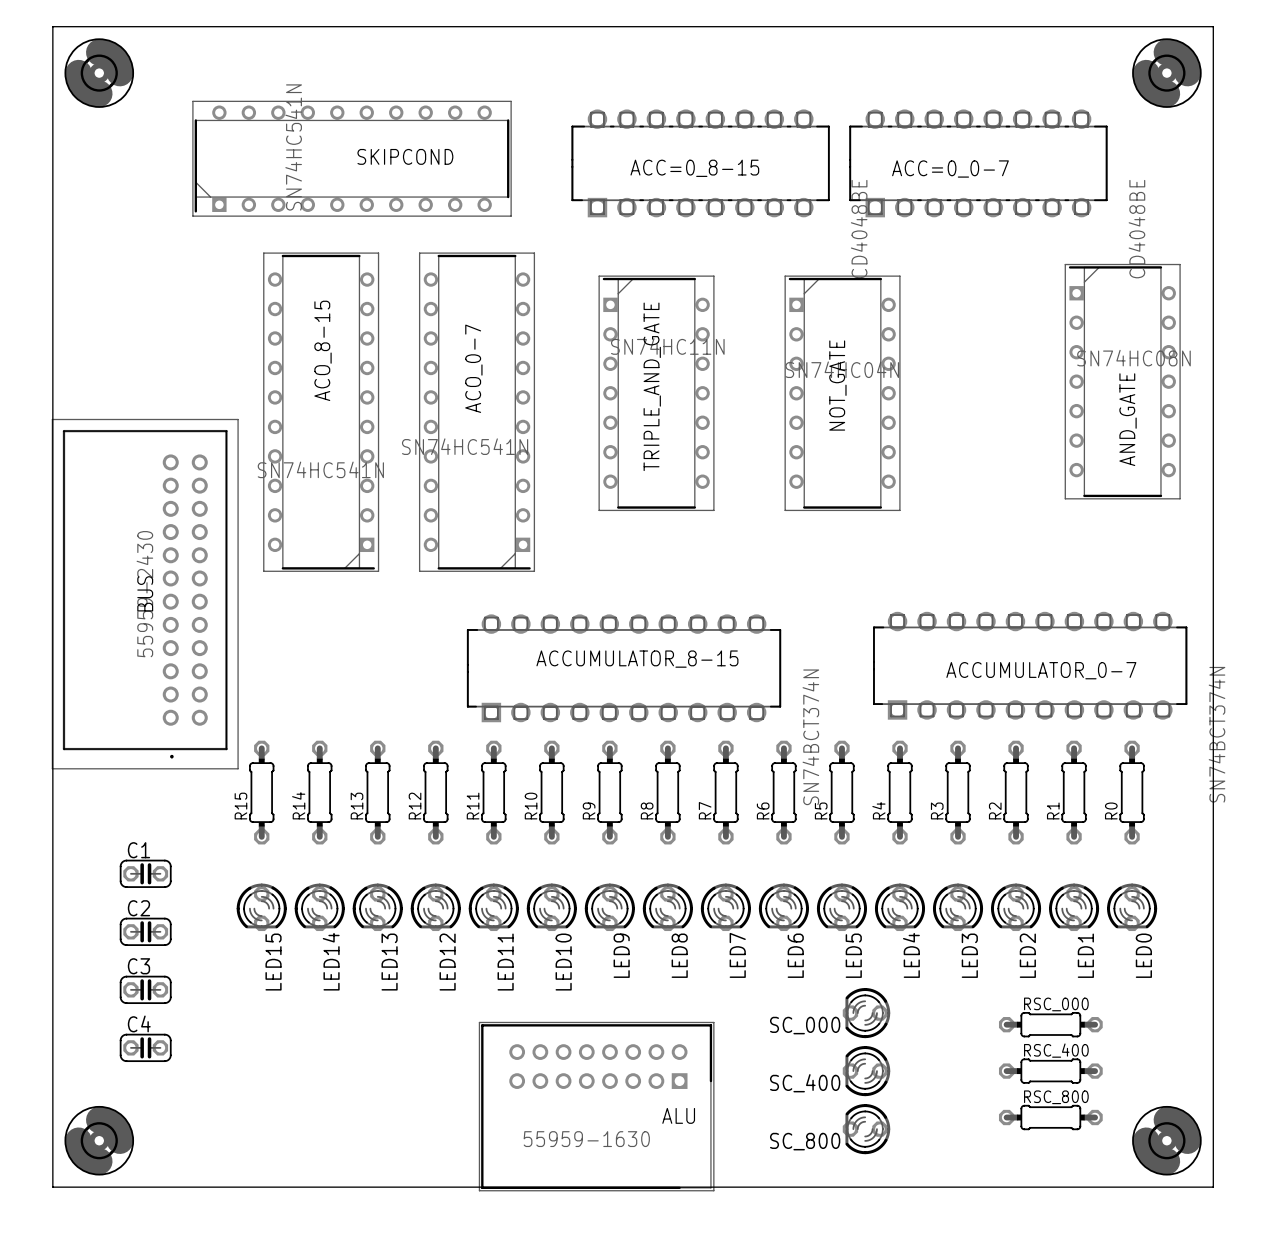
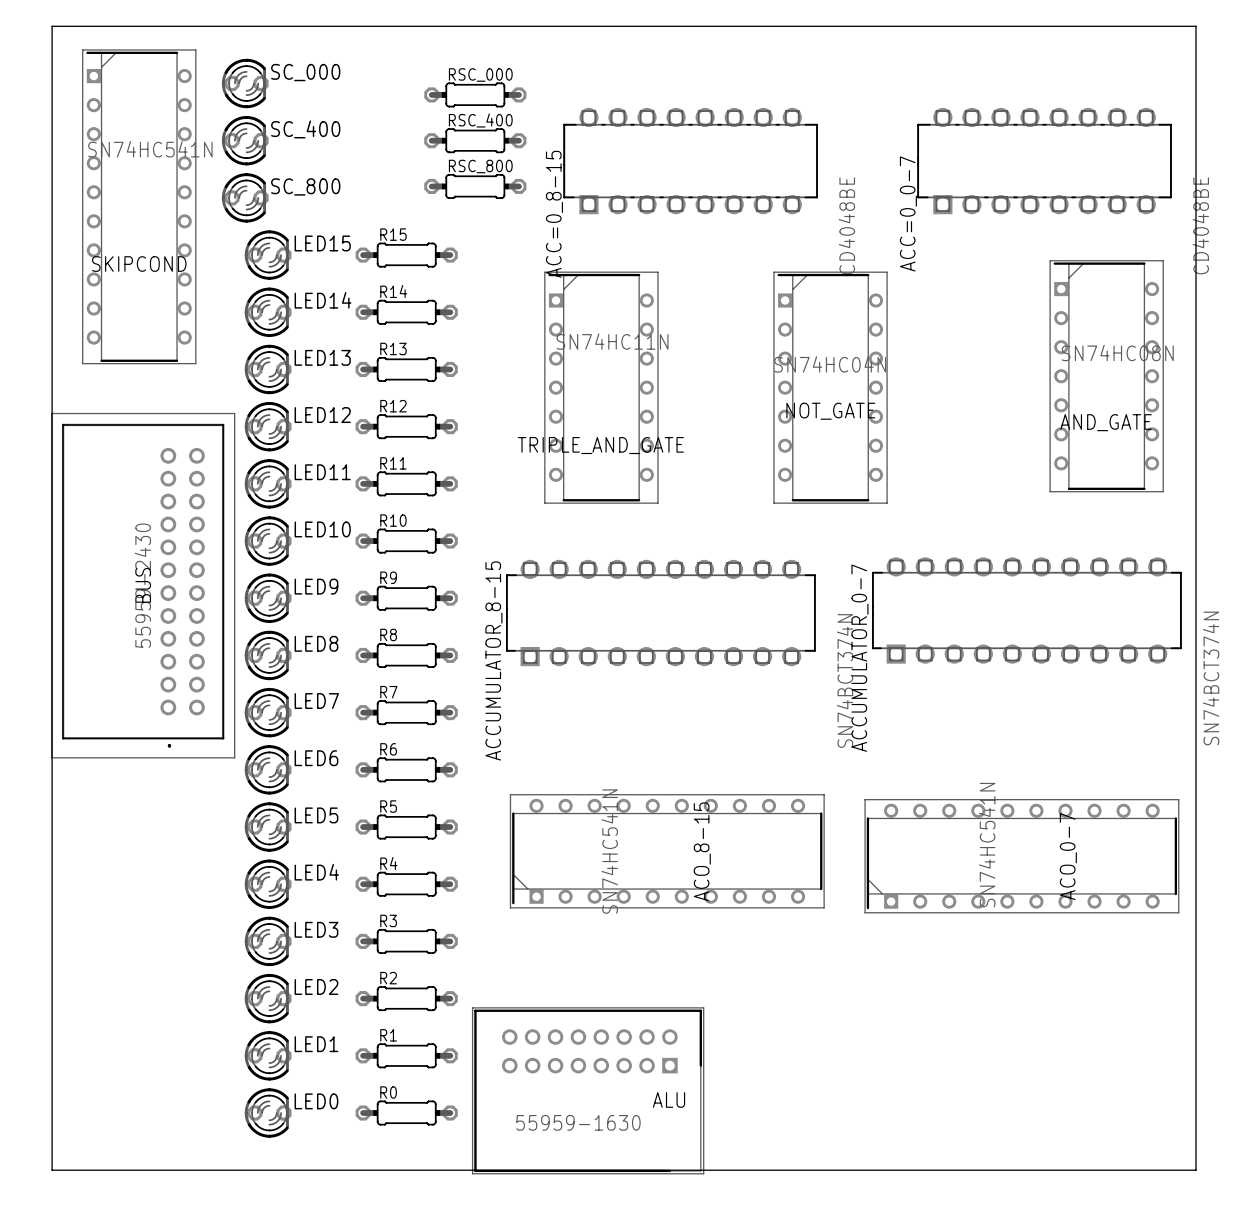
part: (99, 73) -> none
part: (1166, 73) -> none
SKIPCOND rotation: 0° (352, 158) -> 90° clockwise (139, 206)
SKIPCOND position: (352, 158) -> (139, 206)
ACC=0_0-7 position: (978, 163) -> (1044, 161)
ACC=0_8-15 name rotation: 0° (694, 168) -> 90° counterclockwise (554, 214)
ACC=0_0-7 name rotation: 0° (950, 169) -> 90° counterclockwise (908, 213)
ACO_8-15 name position: ACO_8-15 (323, 350) -> ACO_8-15 (702, 851)
NOT_GATE name rotation: 0° (837, 385) -> 90° clockwise (830, 411)
TRIPLE_AND_GATE name rotation: 0° (652, 386) -> 90° clockwise (600, 445)
TRIPLE_AND_GATE position: (656, 393) -> (601, 387)
ACO_8-15 rotation: 0° (321, 412) -> 90° clockwise (667, 851)
ACO_8-15 position: (321, 412) -> (667, 851)
ACO_0-7 rotation: 0° (477, 412) -> 90° clockwise (1021, 856)
ACO_0-7 position: (477, 412) -> (1021, 856)
AND_GATE name rotation: 0° (1128, 419) -> 90° clockwise (1106, 422)
ACCUMULATOR_8-15 name rotation: 0° (637, 659) -> 90° counterclockwise (493, 660)
ACCUMULATOR_0-7 position: (1030, 665) -> (1026, 610)
ACCUMULATOR_8-15 position: (624, 668) -> (660, 613)
ACCUMULATOR_0-7 name rotation: 0° (1041, 670) -> 90° counterclockwise (859, 658)
R15 rotation: 0° (261, 792) -> 90° clockwise (406, 255)
R15 position: (261, 792) -> (406, 255)
R14 rotation: 0° (319, 792) -> 90° clockwise (406, 312)
R14 position: (319, 792) -> (406, 312)
R13 rotation: 0° (377, 792) -> 90° clockwise (406, 369)
R13 position: (377, 792) -> (406, 369)
R12 rotation: 0° (435, 792) -> 90° clockwise (406, 426)
R12 position: (435, 792) -> (406, 426)
R11 rotation: 0° (493, 792) -> 90° clockwise (406, 483)
R11 position: (493, 792) -> (406, 483)
R10 rotation: 0° (551, 792) -> 90° clockwise (406, 541)
R10 position: (551, 792) -> (406, 541)
R9 rotation: 0° (609, 792) -> 90° clockwise (406, 598)
R9 position: (609, 792) -> (406, 598)
R8 rotation: 0° (667, 792) -> 90° clockwise (406, 655)
R8 position: (667, 792) -> (406, 655)
R7 rotation: 0° (725, 792) -> 90° clockwise (406, 712)
R7 position: (725, 792) -> (406, 712)
R6 rotation: 0° (783, 792) -> 90° clockwise (406, 769)
R6 position: (783, 792) -> (406, 769)
R5 rotation: 0° (841, 792) -> 90° clockwise (406, 827)
R5 position: (841, 792) -> (406, 827)
R4 rotation: 0° (899, 792) -> 90° clockwise (406, 884)
R4 position: (899, 792) -> (406, 884)
R3 rotation: 0° (958, 792) -> 90° clockwise (406, 941)
R3 position: (958, 792) -> (406, 941)
R2 rotation: 0° (1016, 792) -> 90° clockwise (406, 998)
R2 position: (1016, 792) -> (406, 998)
R1 rotation: 0° (1074, 792) -> 90° clockwise (406, 1055)
R1 position: (1074, 792) -> (406, 1055)
R0 rotation: 0° (1132, 792) -> 90° clockwise (406, 1113)
R0 position: (1132, 792) -> (406, 1113)
C1: (145, 873) -> none
LED15 rotation: 0° (261, 907) -> 90° counterclockwise (268, 255)
LED15 position: (261, 907) -> (268, 255)
LED14 rotation: 0° (319, 907) -> 90° counterclockwise (268, 312)
LED14 position: (319, 907) -> (268, 312)
LED13 rotation: 0° (377, 907) -> 90° counterclockwise (268, 369)
LED13 position: (377, 907) -> (268, 369)
LED12 rotation: 0° (435, 907) -> 90° counterclockwise (268, 426)
LED12 position: (435, 907) -> (268, 426)
LED11 rotation: 0° (493, 907) -> 90° counterclockwise (268, 483)
LED11 position: (493, 907) -> (268, 483)
LED10 rotation: 0° (551, 907) -> 90° counterclockwise (268, 541)
LED10 position: (551, 907) -> (268, 541)
LED9 rotation: 0° (609, 907) -> 90° counterclockwise (268, 598)
LED9 position: (609, 907) -> (268, 598)
LED8 rotation: 0° (667, 907) -> 90° counterclockwise (268, 655)
LED8 position: (667, 907) -> (268, 655)
LED7 rotation: 0° (725, 907) -> 90° counterclockwise (268, 712)
LED7 position: (725, 907) -> (268, 712)
LED6 rotation: 0° (783, 907) -> 90° counterclockwise (268, 769)
LED6 position: (783, 907) -> (268, 769)
LED5 rotation: 0° (841, 907) -> 90° counterclockwise (268, 827)
LED5 position: (841, 907) -> (268, 827)
LED4 rotation: 0° (899, 907) -> 90° counterclockwise (268, 884)
LED4 position: (899, 907) -> (268, 884)
LED3 rotation: 0° (958, 907) -> 90° counterclockwise (268, 941)
LED3 position: (958, 907) -> (268, 941)
LED2 rotation: 0° (1016, 907) -> 90° counterclockwise (268, 998)
LED2 position: (1016, 907) -> (268, 998)
LED1 rotation: 0° (1074, 907) -> 90° counterclockwise (268, 1055)
LED1 position: (1074, 907) -> (268, 1055)
LED0 rotation: 0° (1132, 907) -> 90° counterclockwise (268, 1113)
LED0 position: (1132, 907) -> (268, 1113)
C2: (145, 931) -> none
C3: (145, 989) -> none
SC_000 rotation: 0° (866, 1013) -> 180° (245, 83)
SC_000 position: (866, 1013) -> (245, 83)
RSC_000 position: (1050, 1024) -> (475, 94)
C4: (145, 1047) -> none
SC_400 rotation: 0° (866, 1071) -> 180° (245, 140)
SC_400 position: (866, 1071) -> (245, 140)
RSC_400 position: (1050, 1071) -> (475, 140)
RSC_800 position: (1050, 1117) -> (475, 186)
SC_800 rotation: 0° (866, 1129) -> 180° (245, 197)
SC_800 position: (866, 1129) -> (245, 197)
part: (99, 1140) -> none
part: (1166, 1140) -> none

